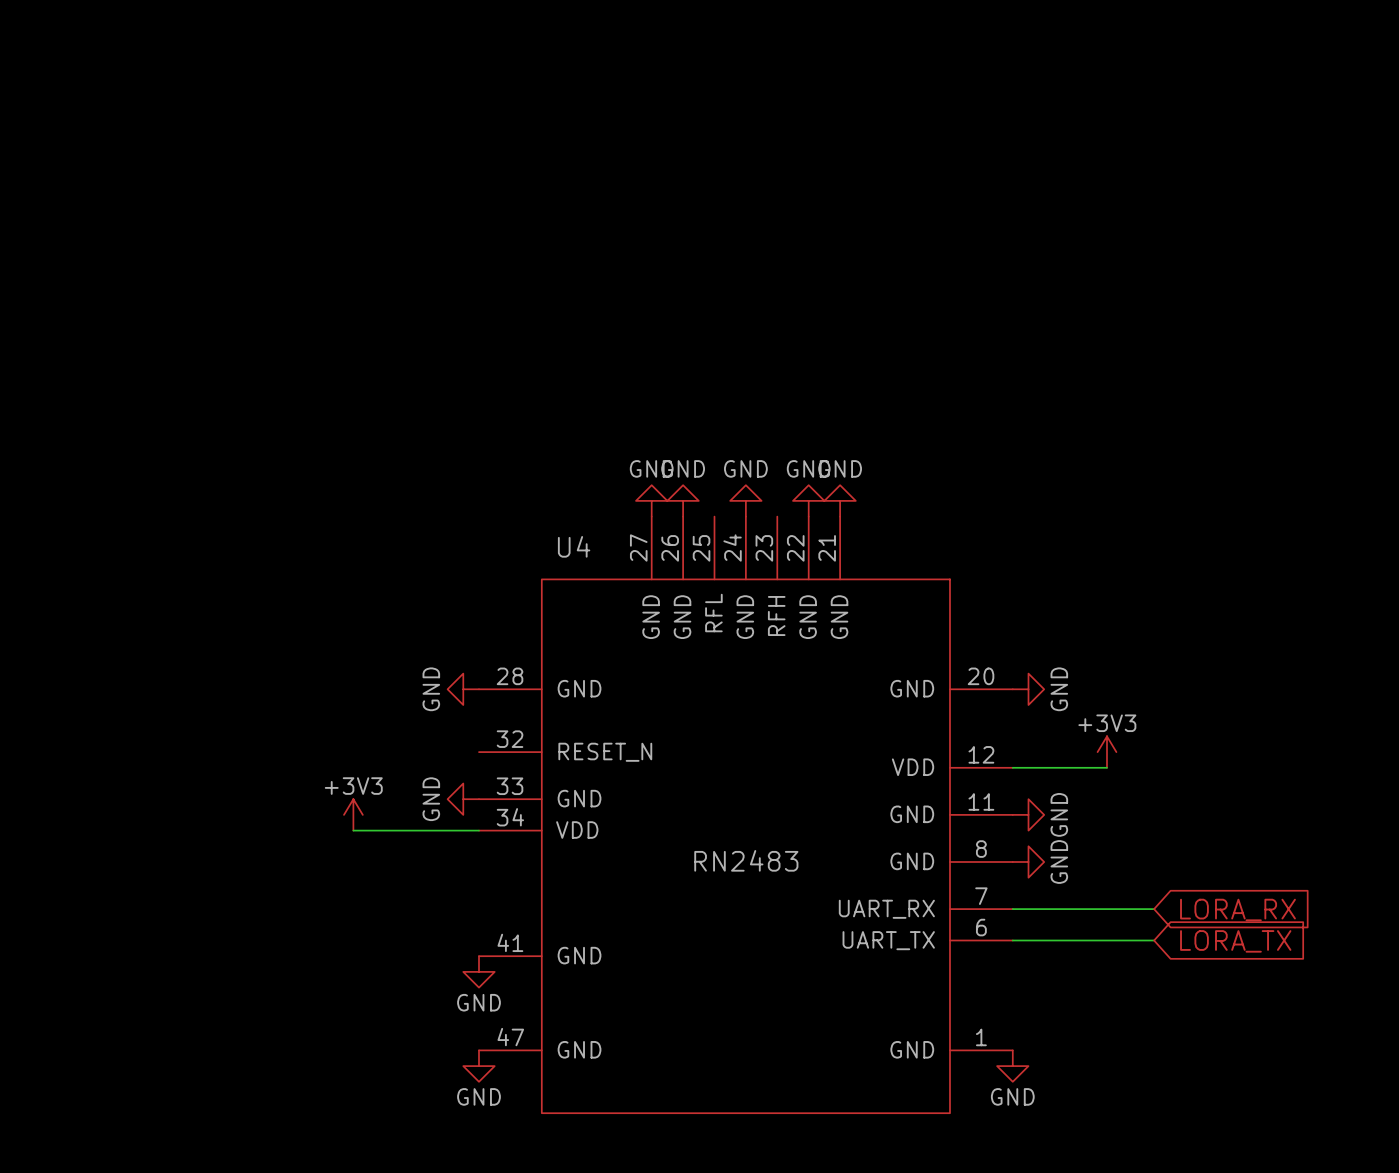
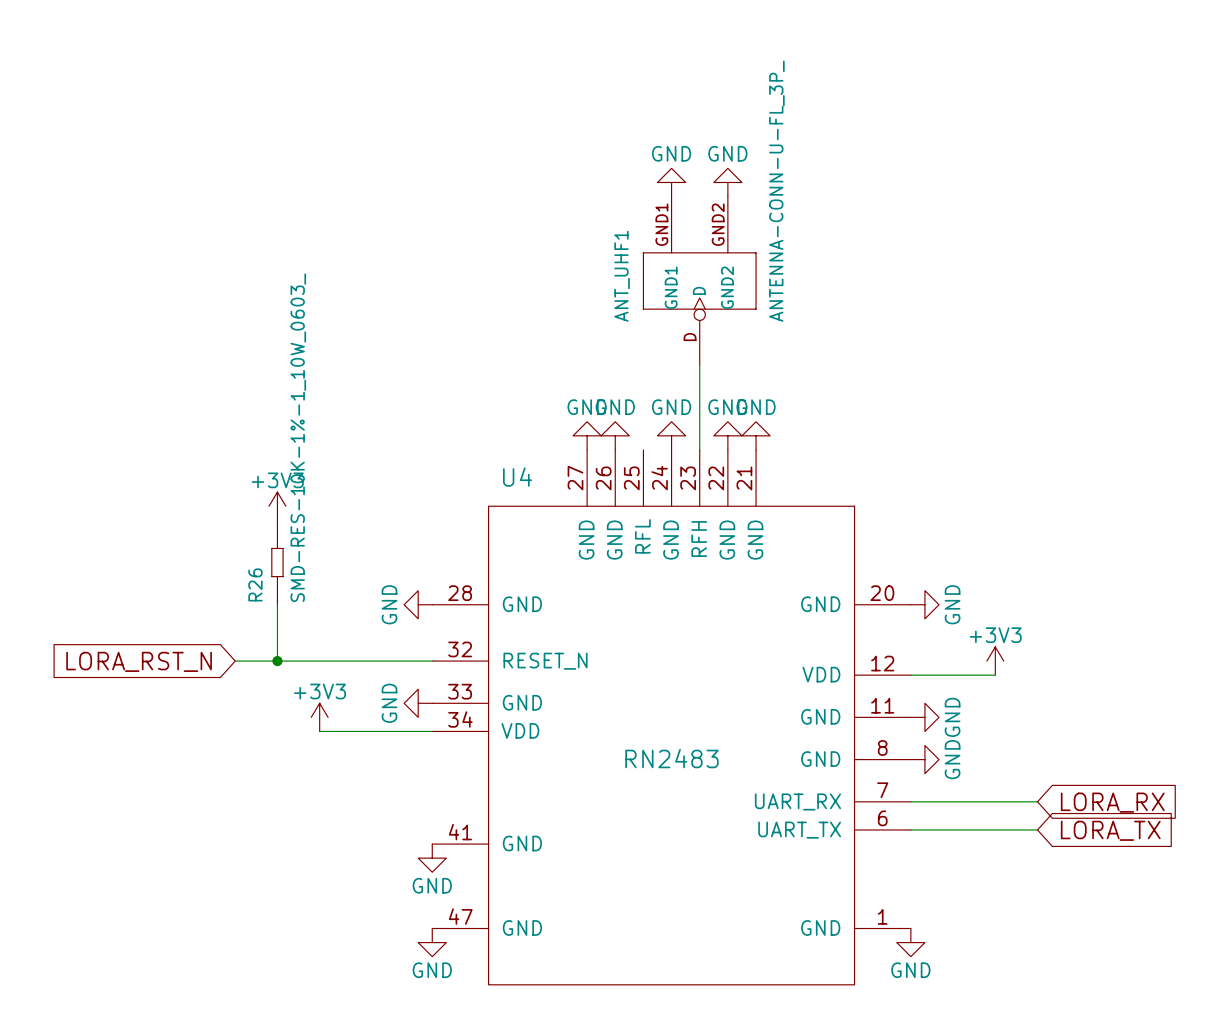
power symbol: none -> GND (671, 182)
power symbol: none -> GND (727, 182)
ANT_UHF1: none -> ANTENNA-CONN-U-FL_3P_ (699, 281)
wire: none -> (699, 365) (699, 449)
power symbol: none -> +3V3 (277, 506)
R26: none -> SMD-RES-10K-1%-1_10W_0603_ (277, 562)
wire: none -> (277, 604) (277, 661)
global label: none -> LORA_RST_N (139, 661)
wire: none -> (235, 661) (432, 661)
junction: none -> (277, 661)

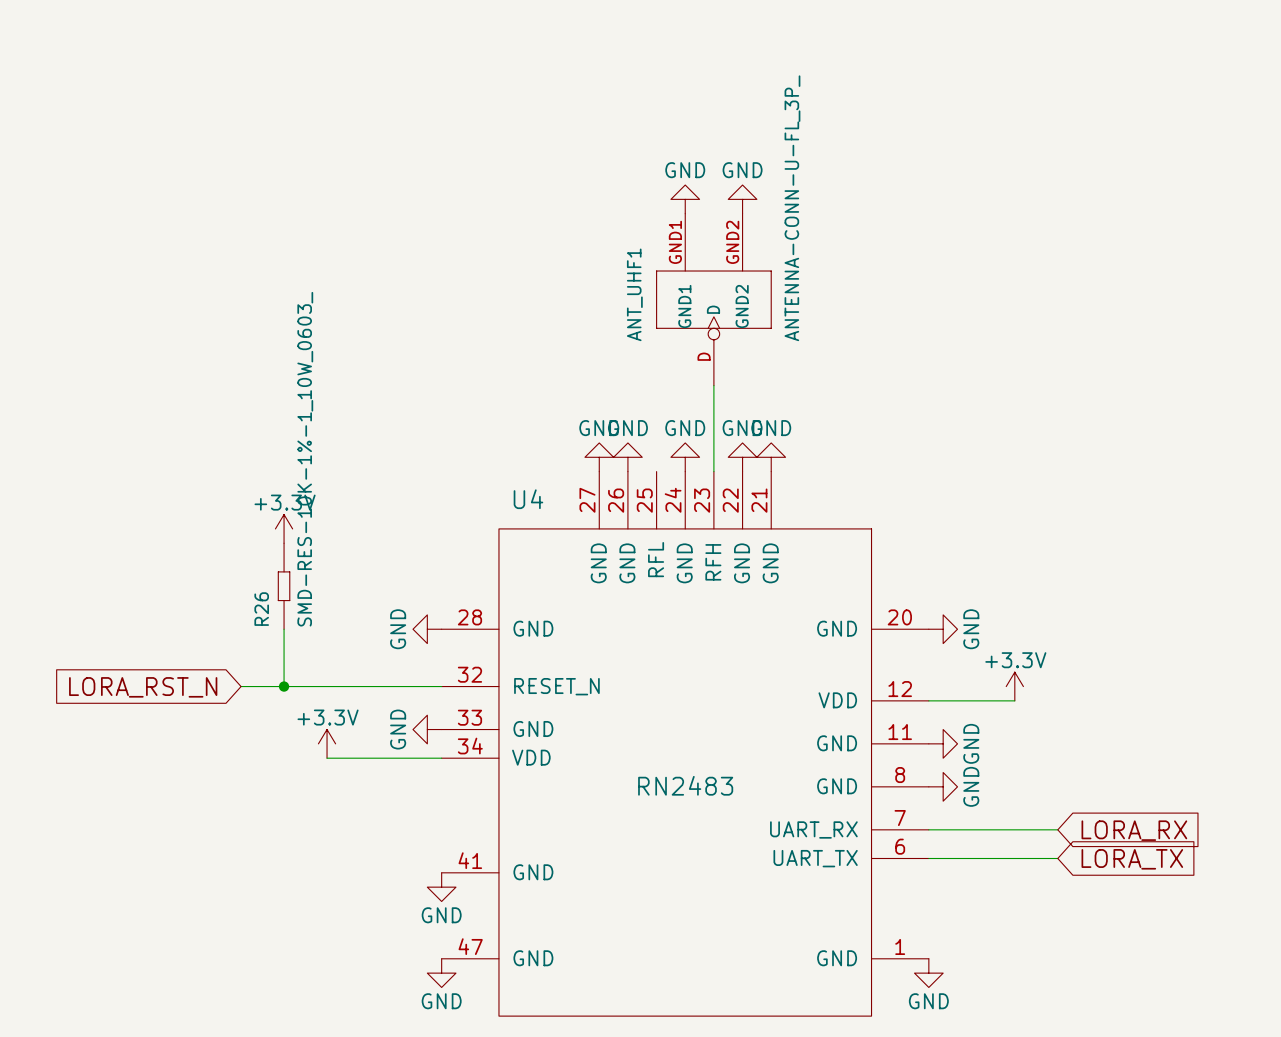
power symbol: +3V3 (277, 506) -> +3.3V (284, 528)
power symbol: +3V3 (995, 661) -> +3.3V (1014, 686)
power symbol: +3V3 (319, 717) -> +3.3V (327, 743)

